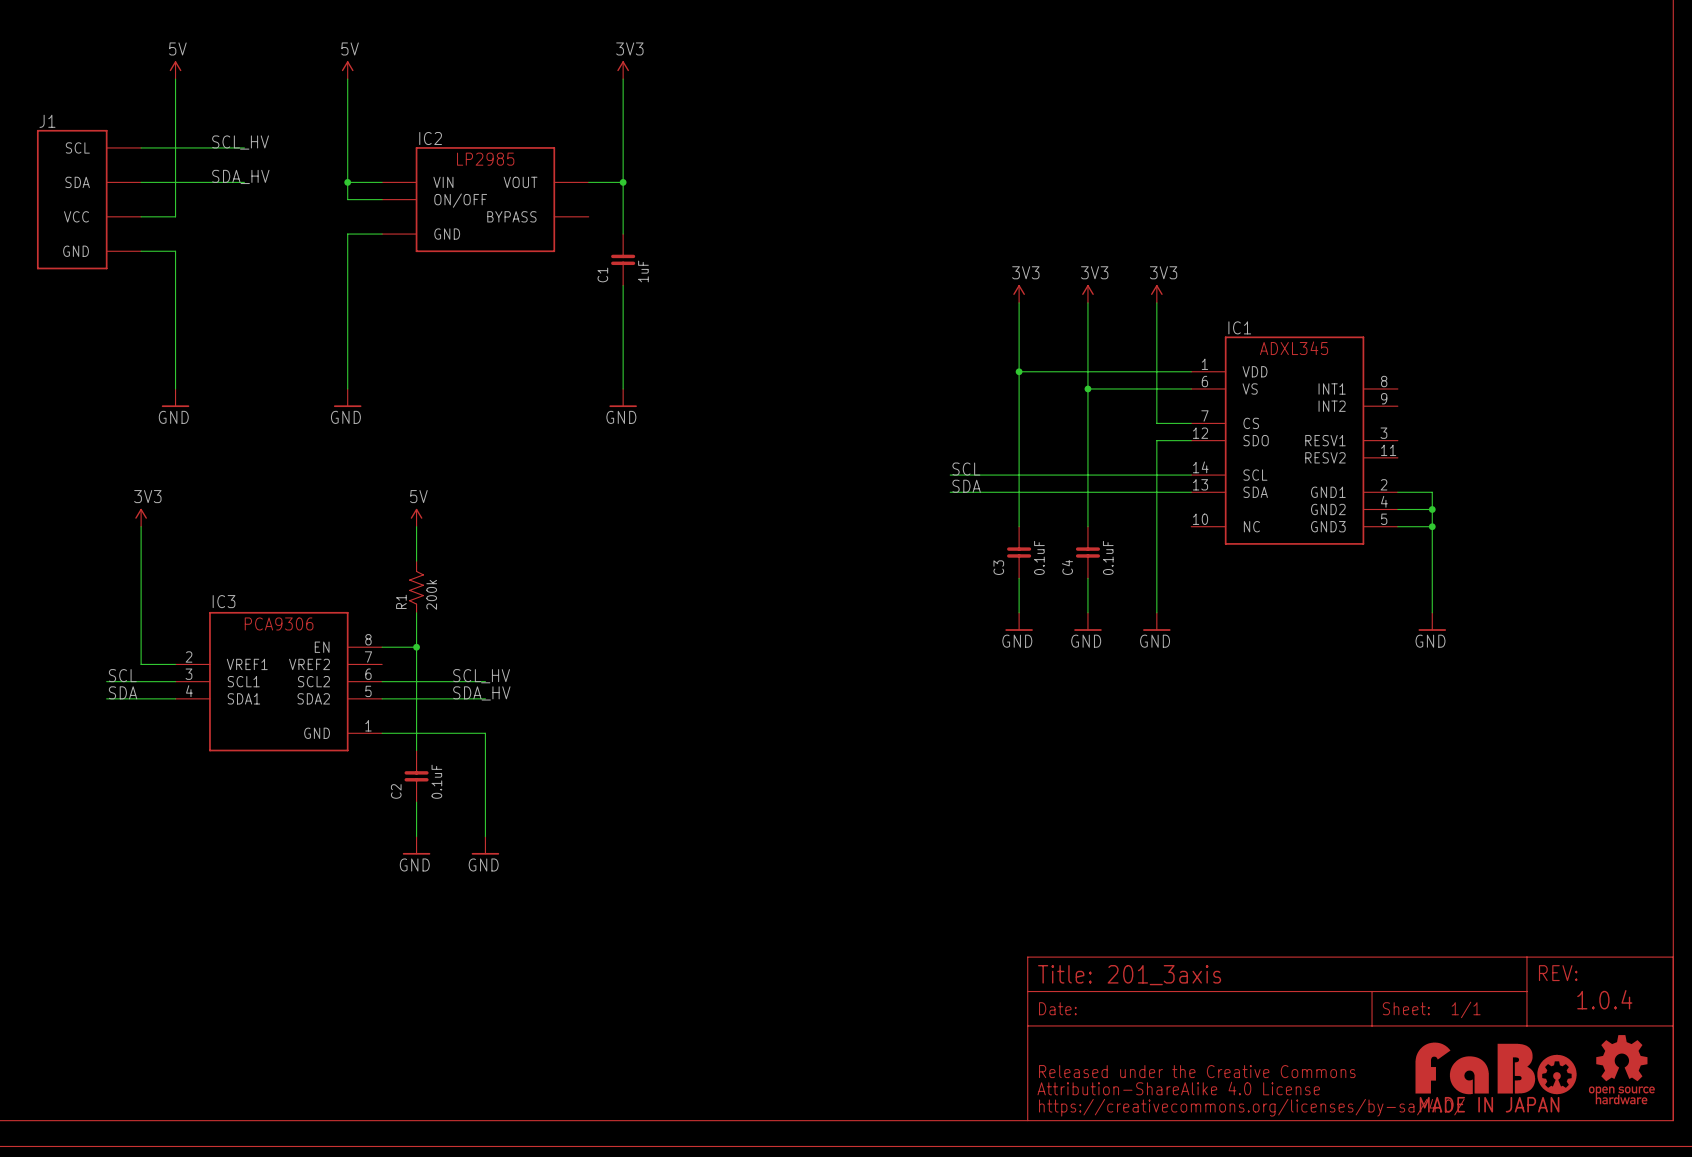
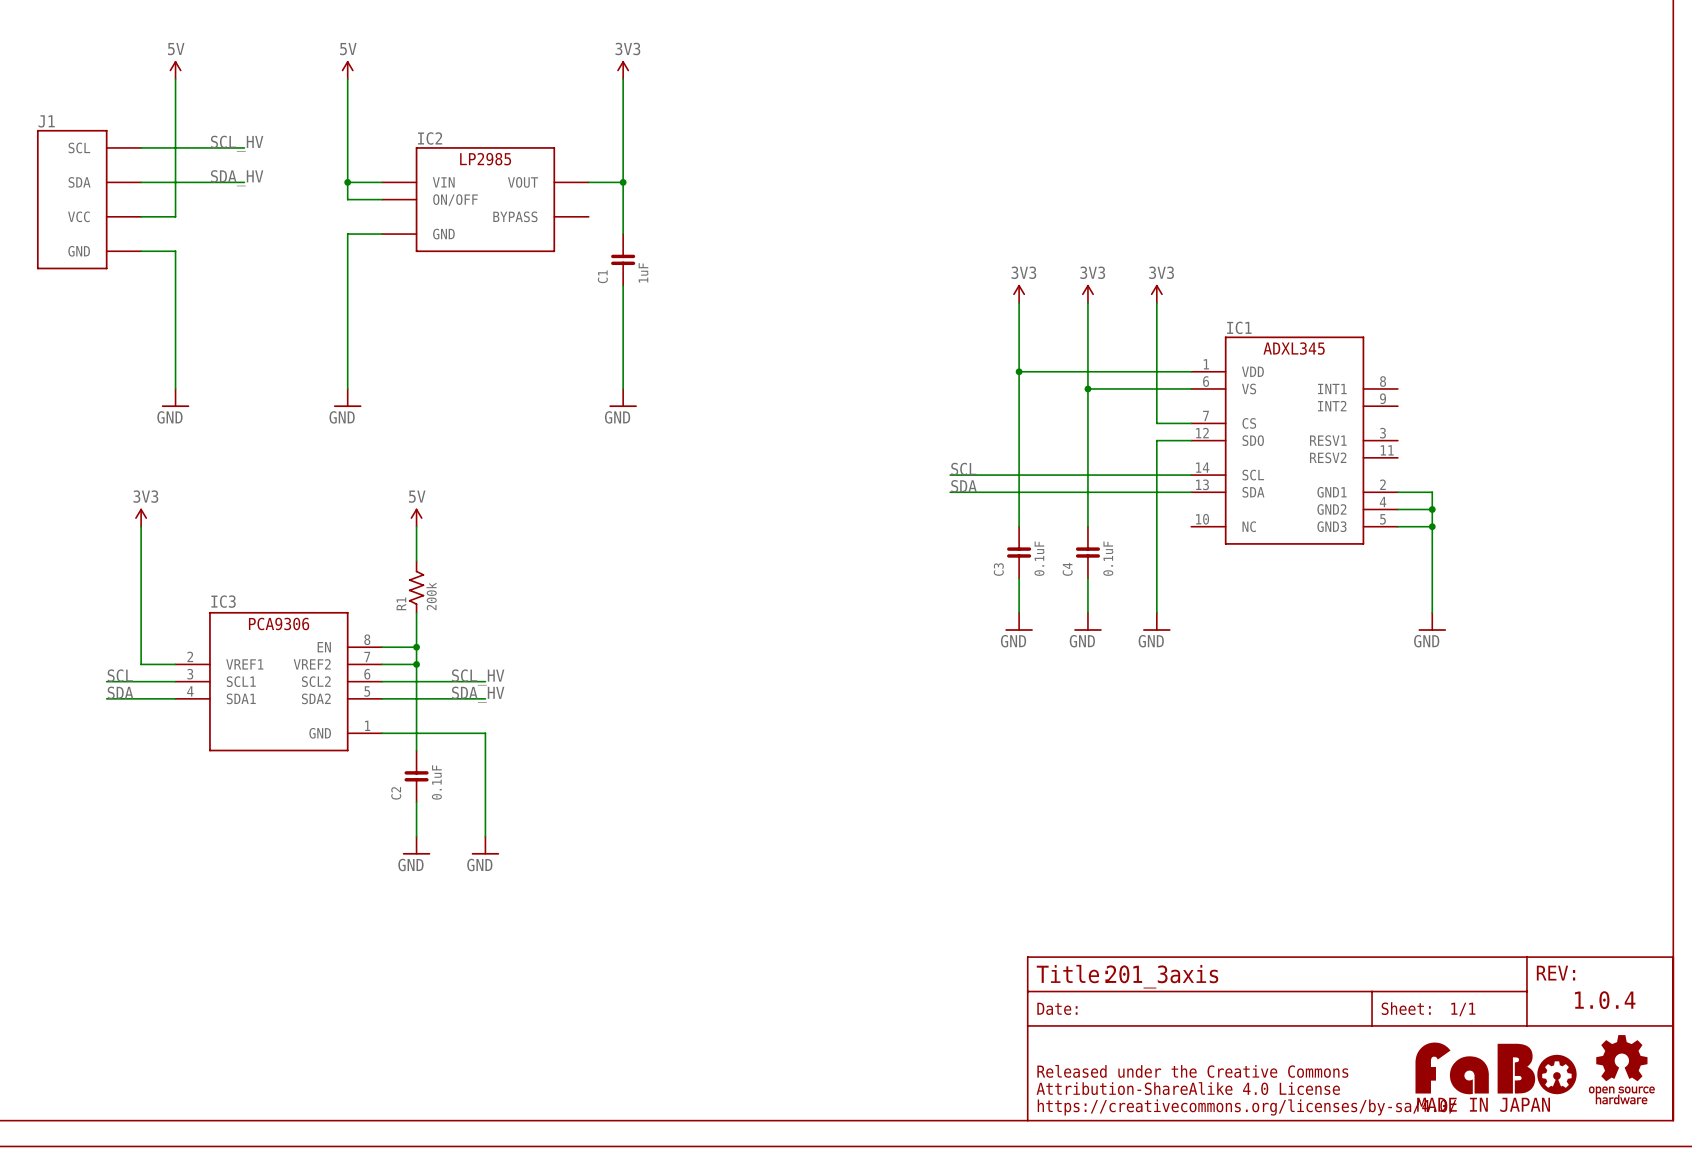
wire: none -> (382, 664) (416, 664)
junction: none -> (416, 664)

